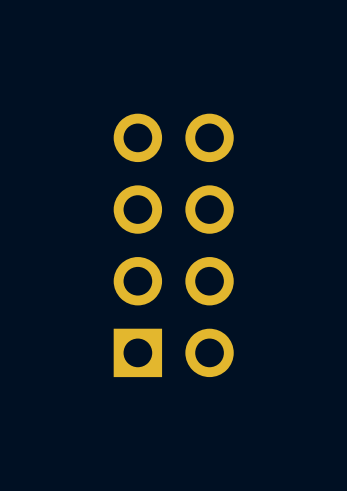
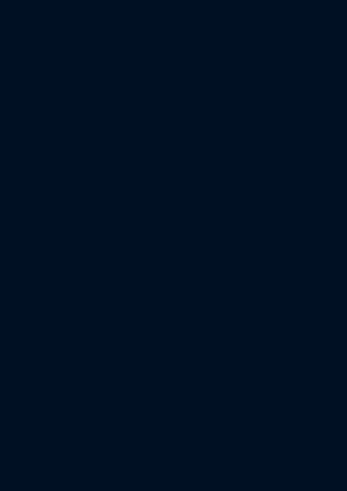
part: (173, 245) -> none

